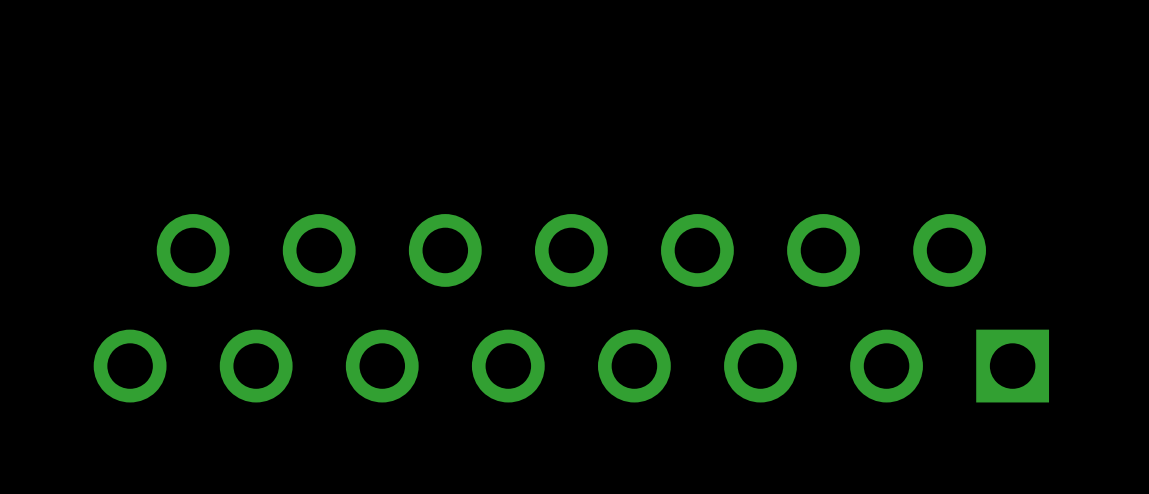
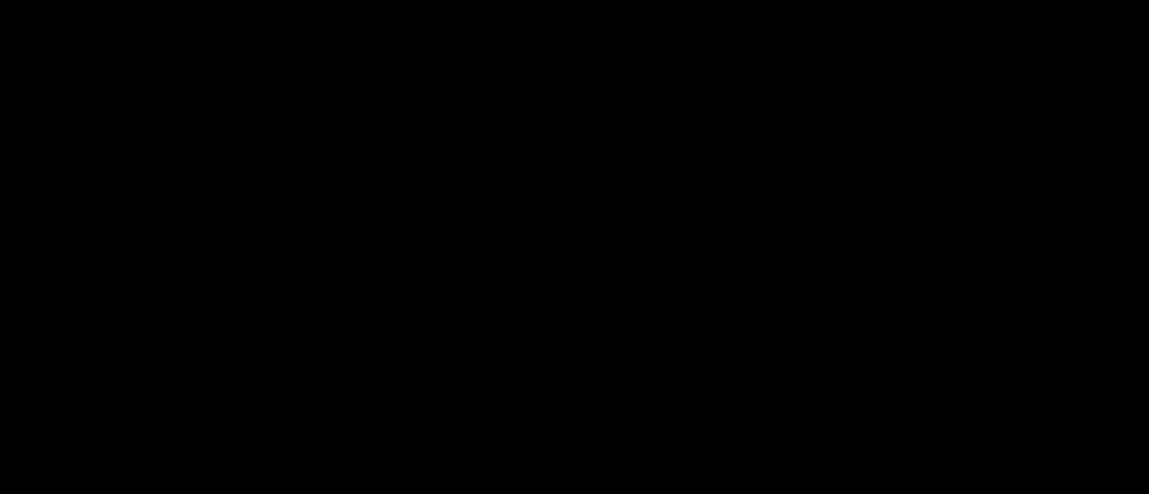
part: (571, 308) -> none

